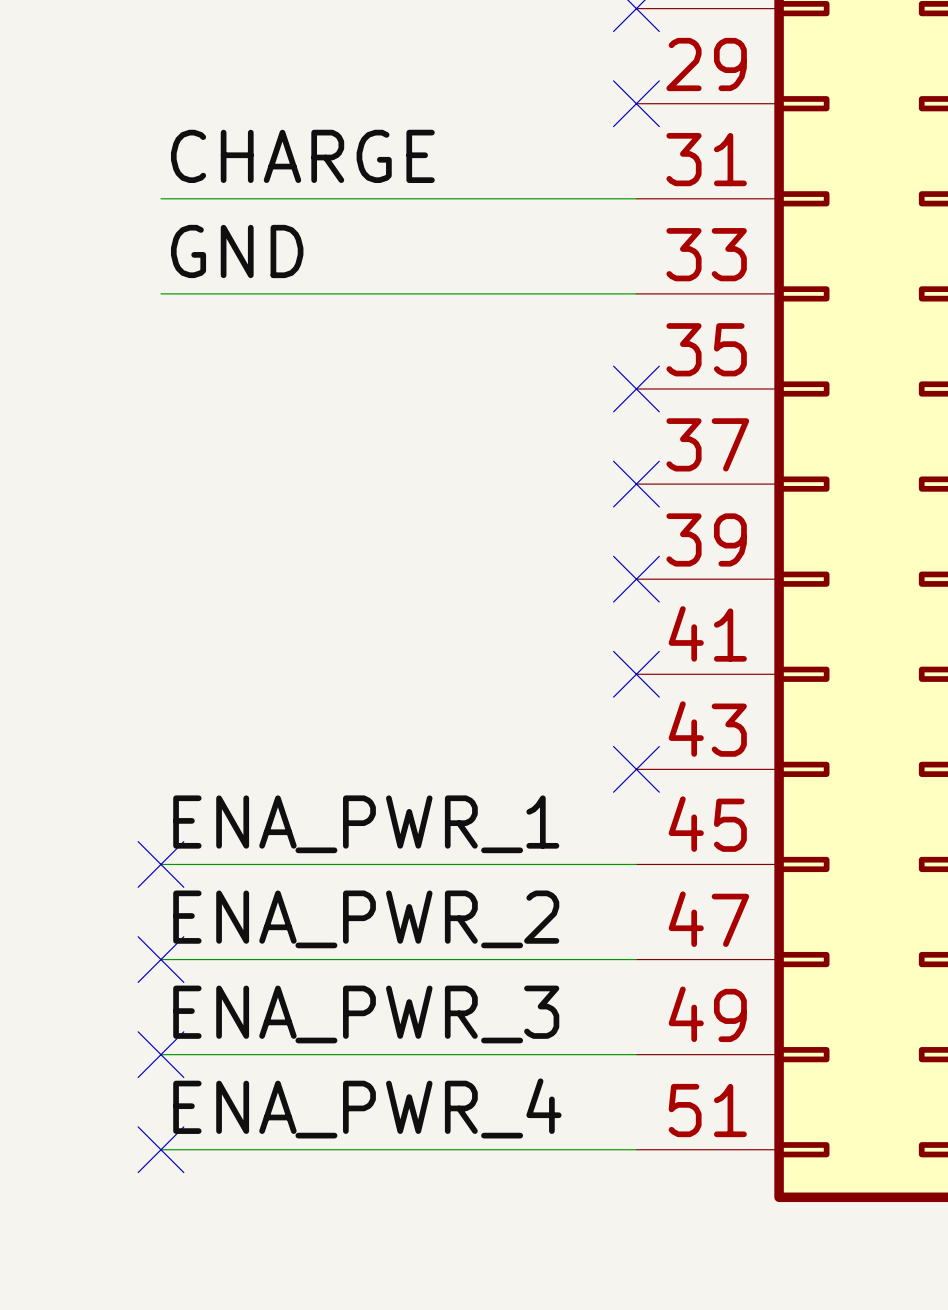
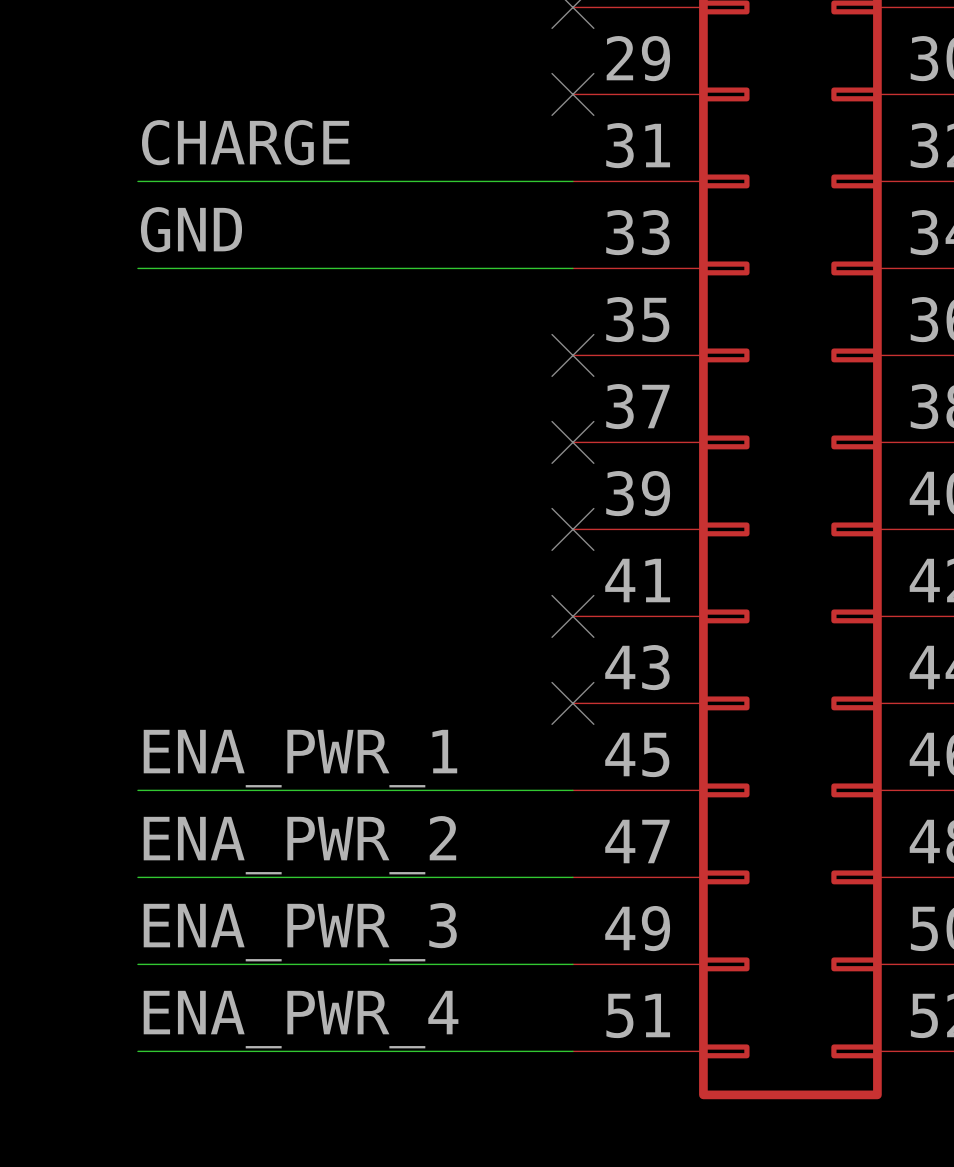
no-connect mark: (160, 864) -> none
no-connect mark: (160, 959) -> none
no-connect mark: (160, 1054) -> none
no-connect mark: (160, 1149) -> none

